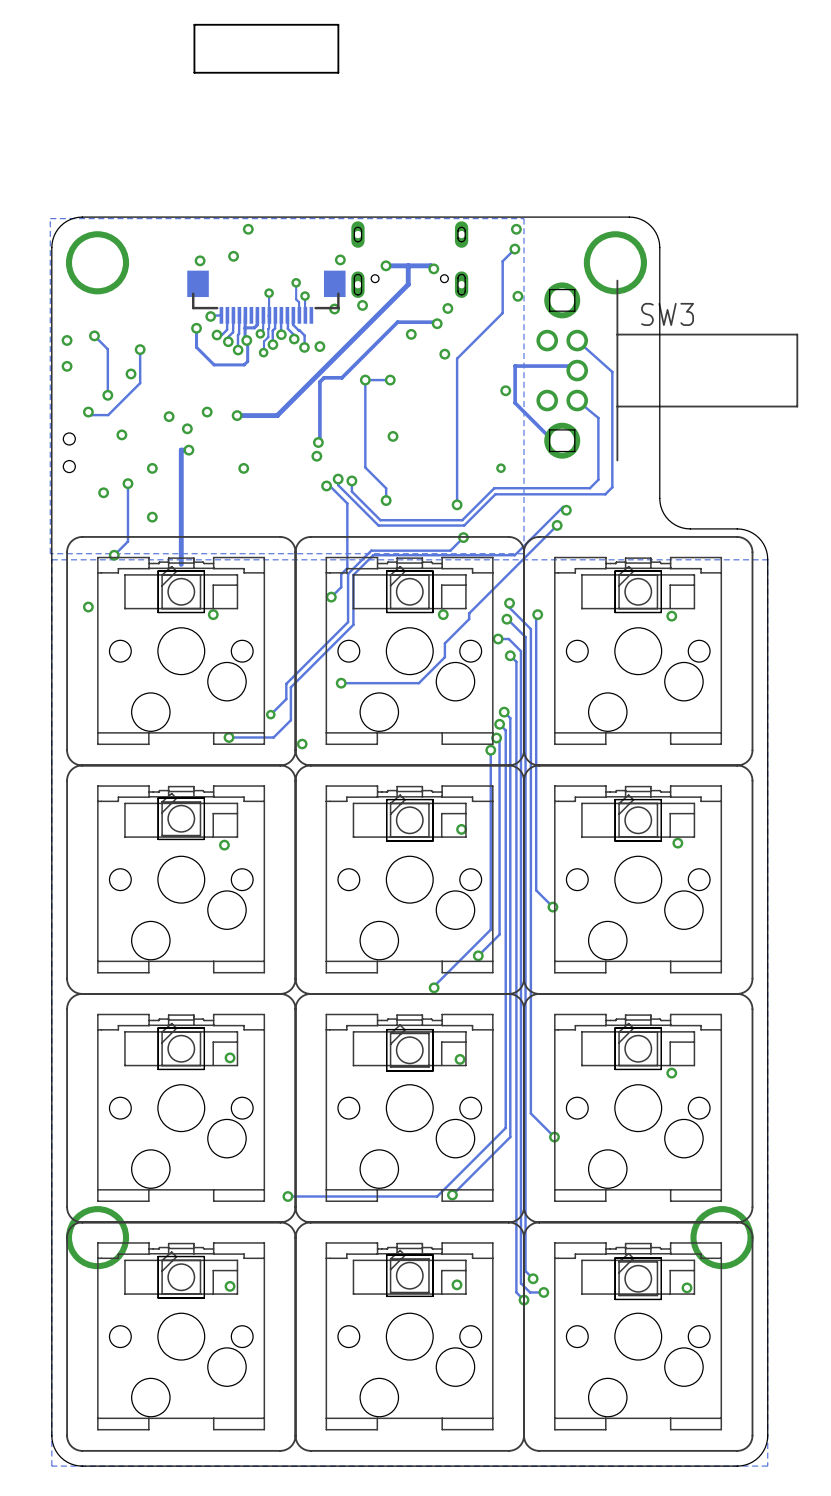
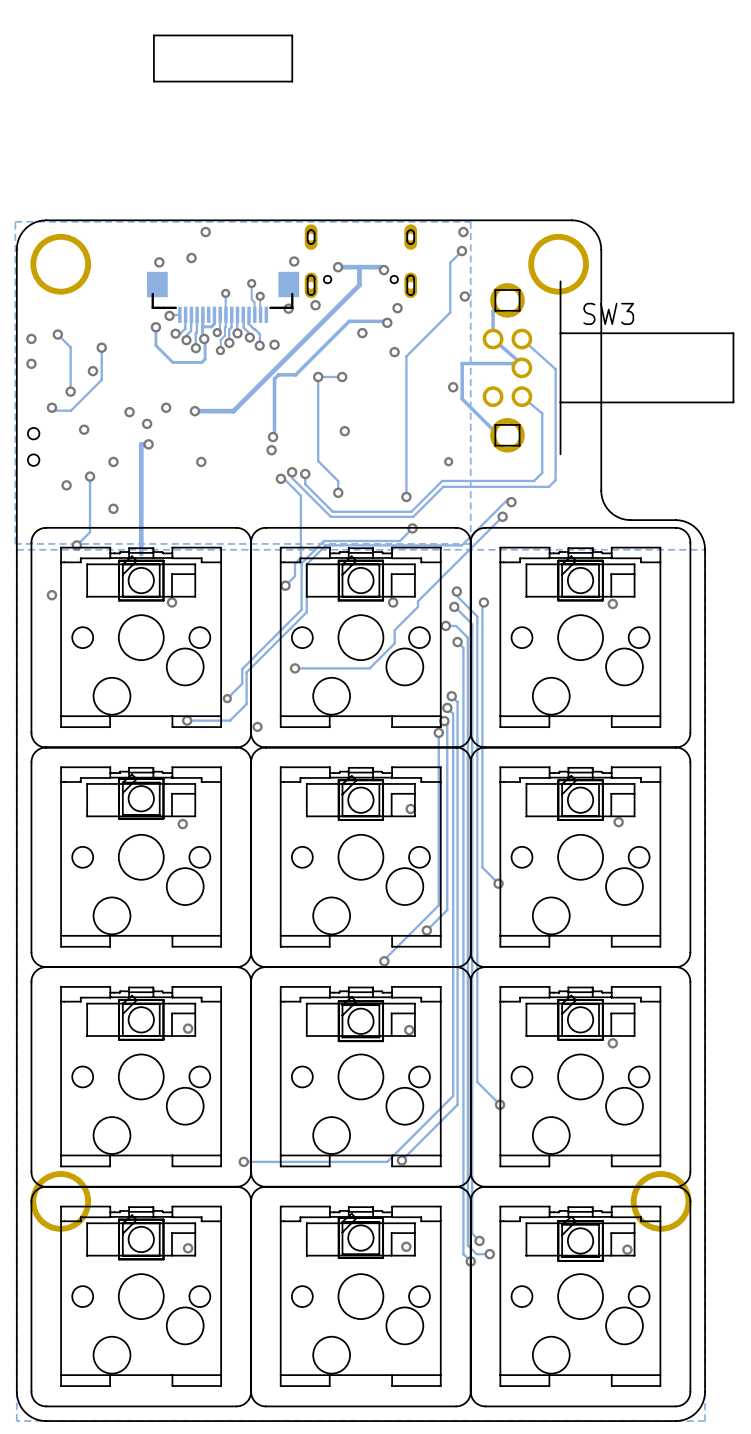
track: none -> (507, 300) (493, 311) (493, 339) (521, 363)

